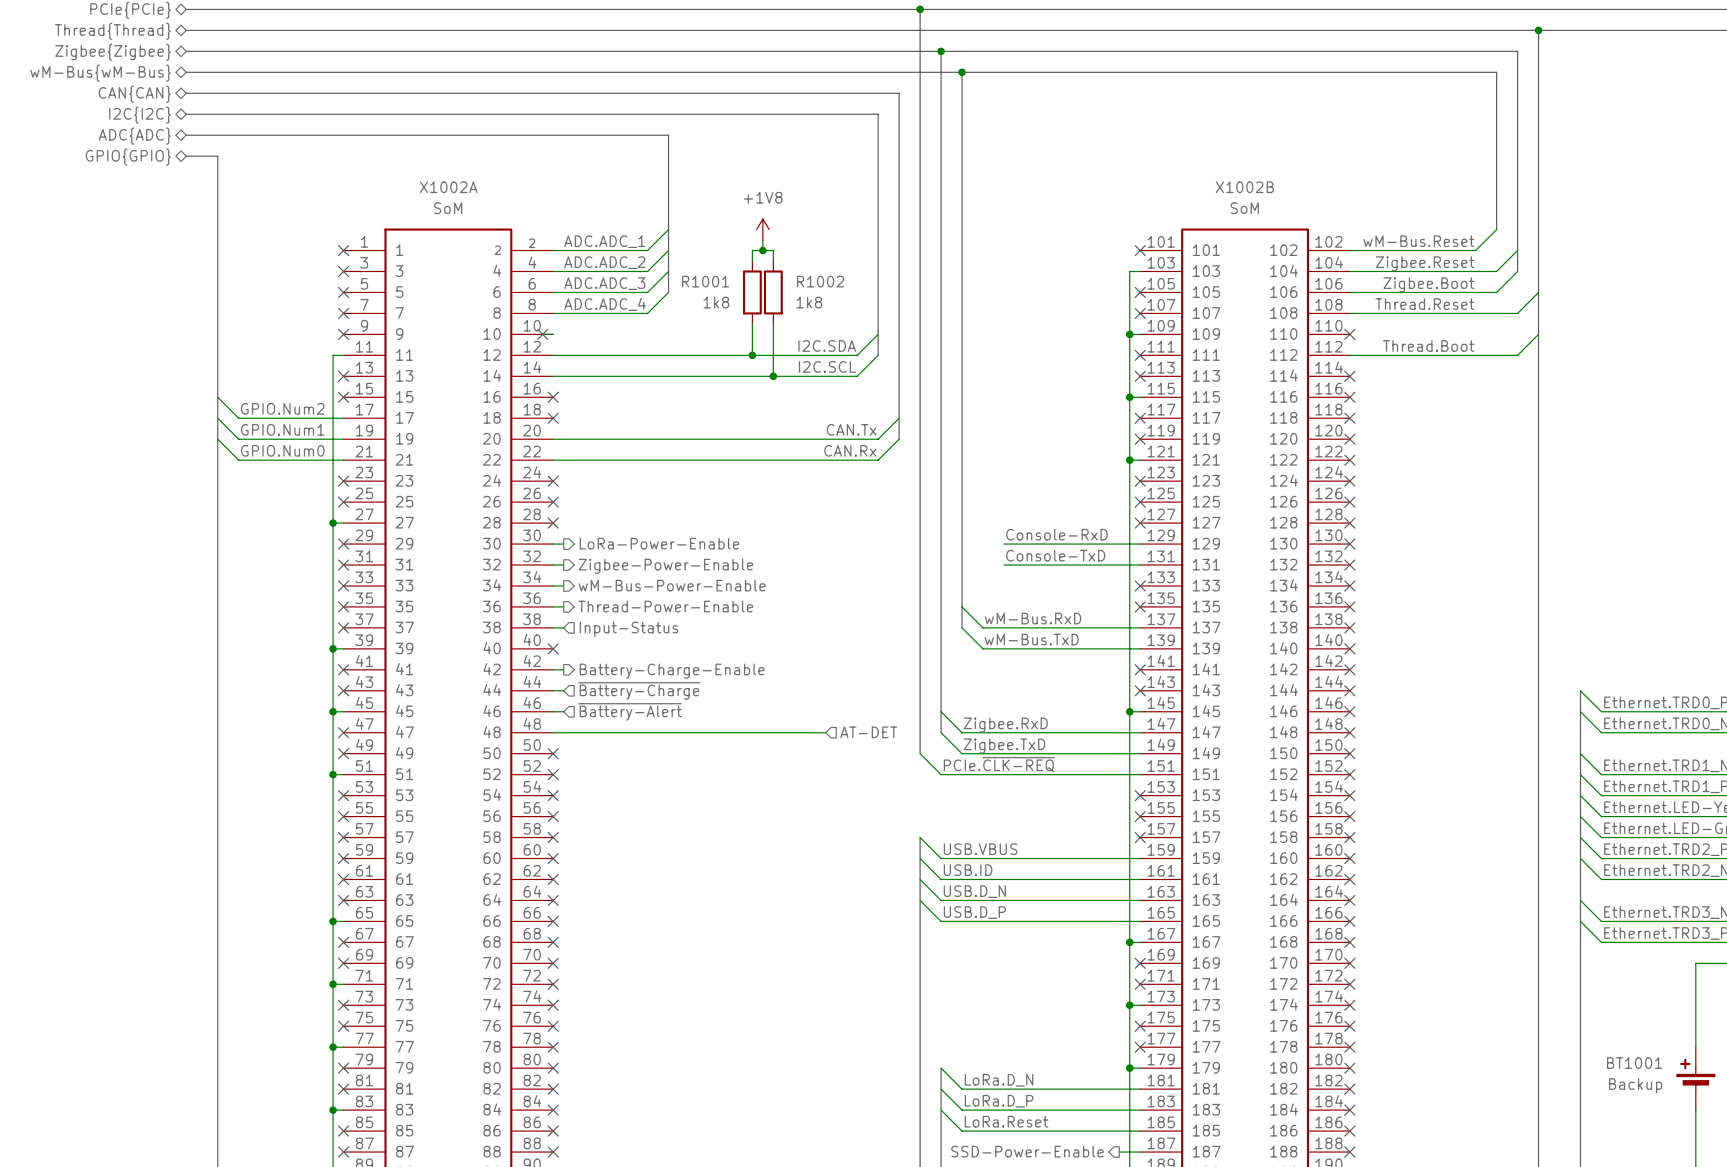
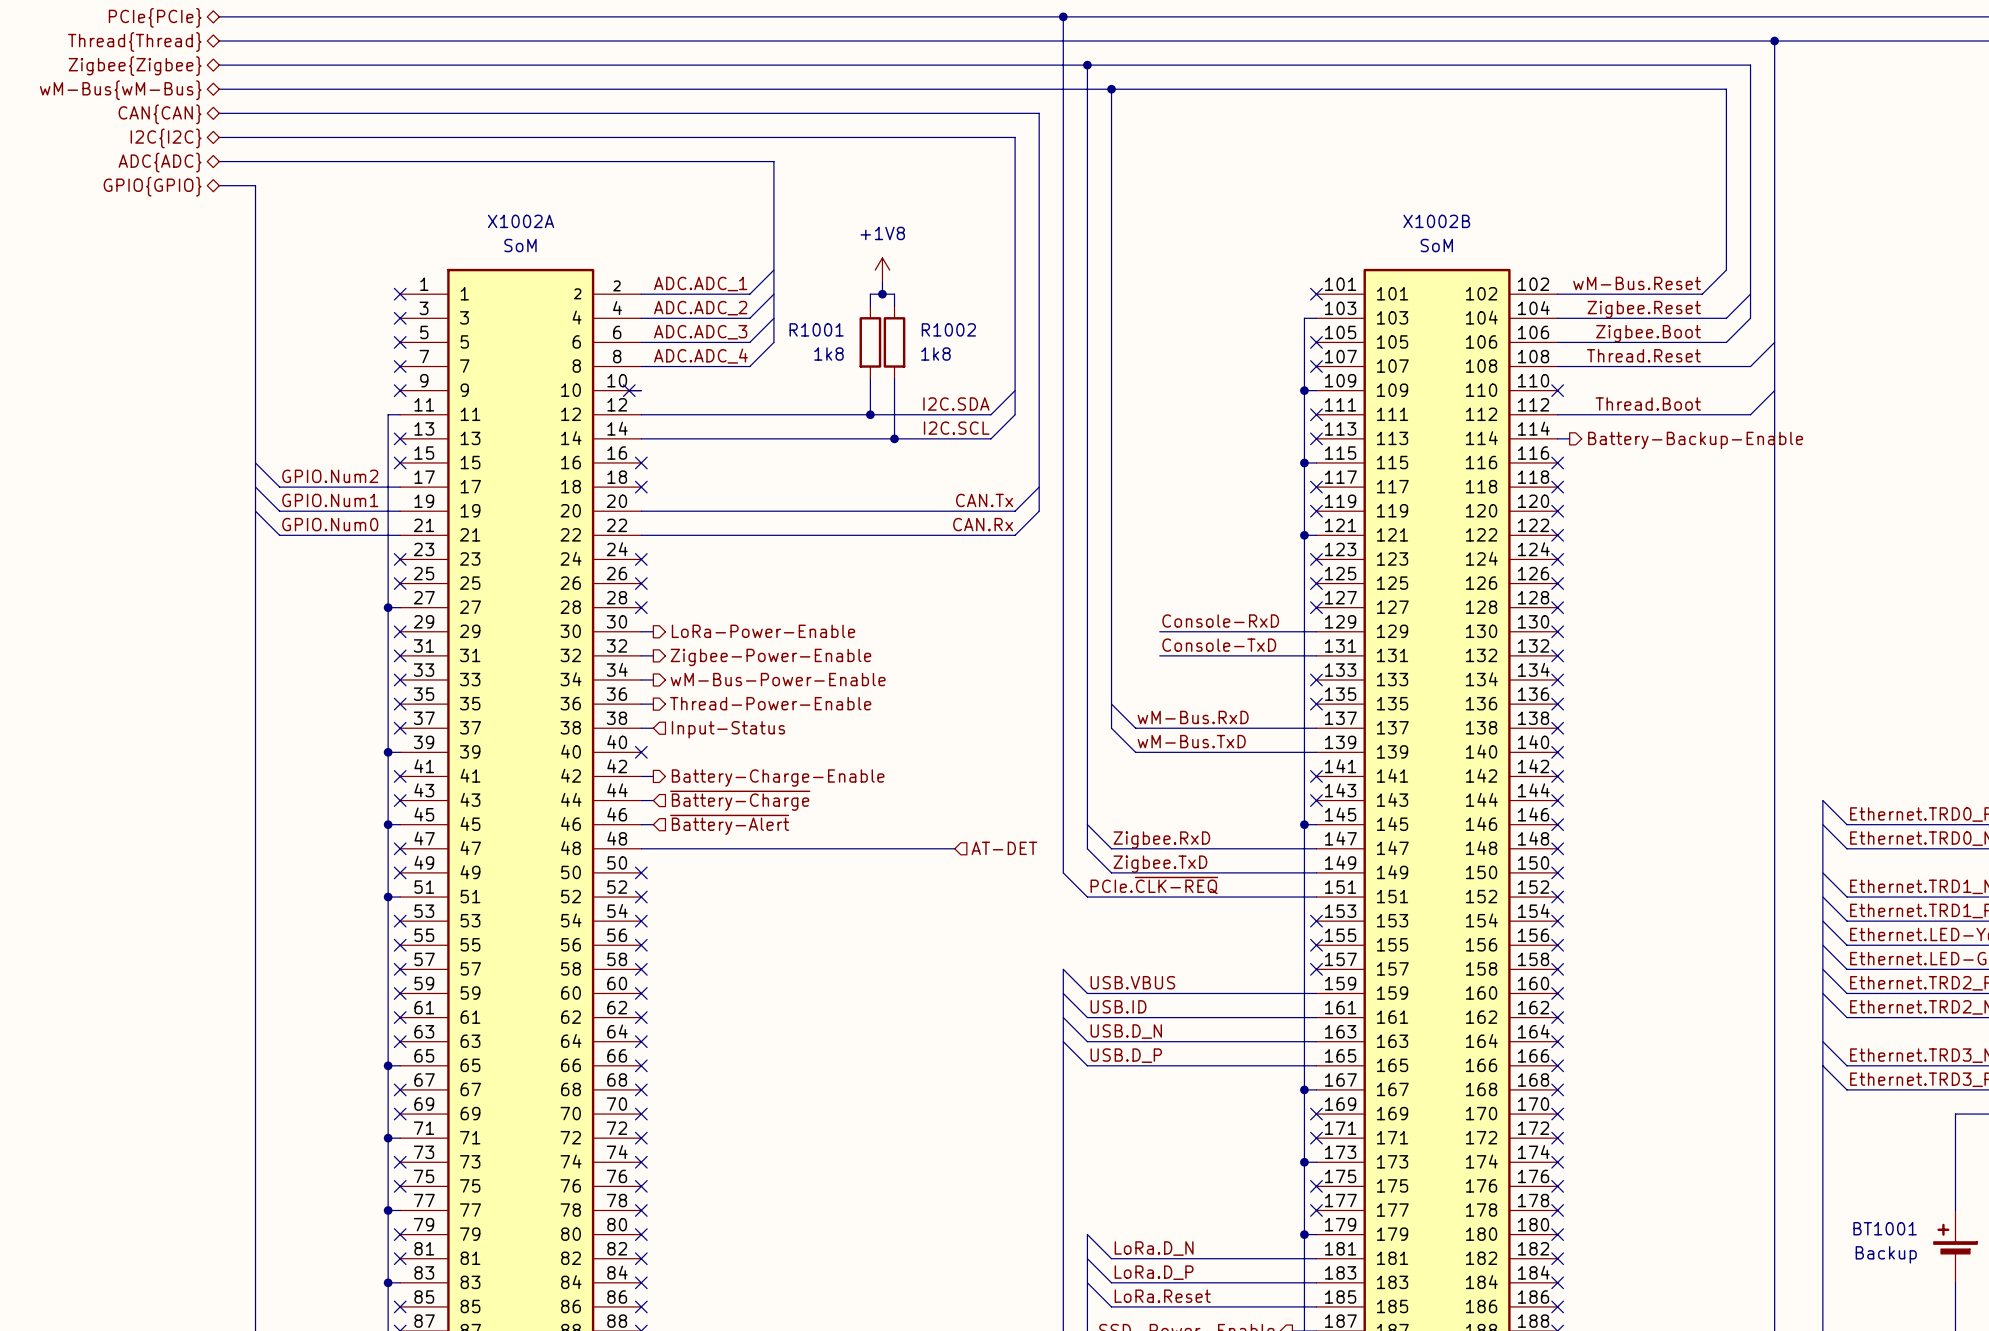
wire: none -> (1557, 438) (1569, 438)
no-connect mark: (1349, 376) -> none
hierarchical label: none -> Battery-Backup-Enable (1695, 440)

